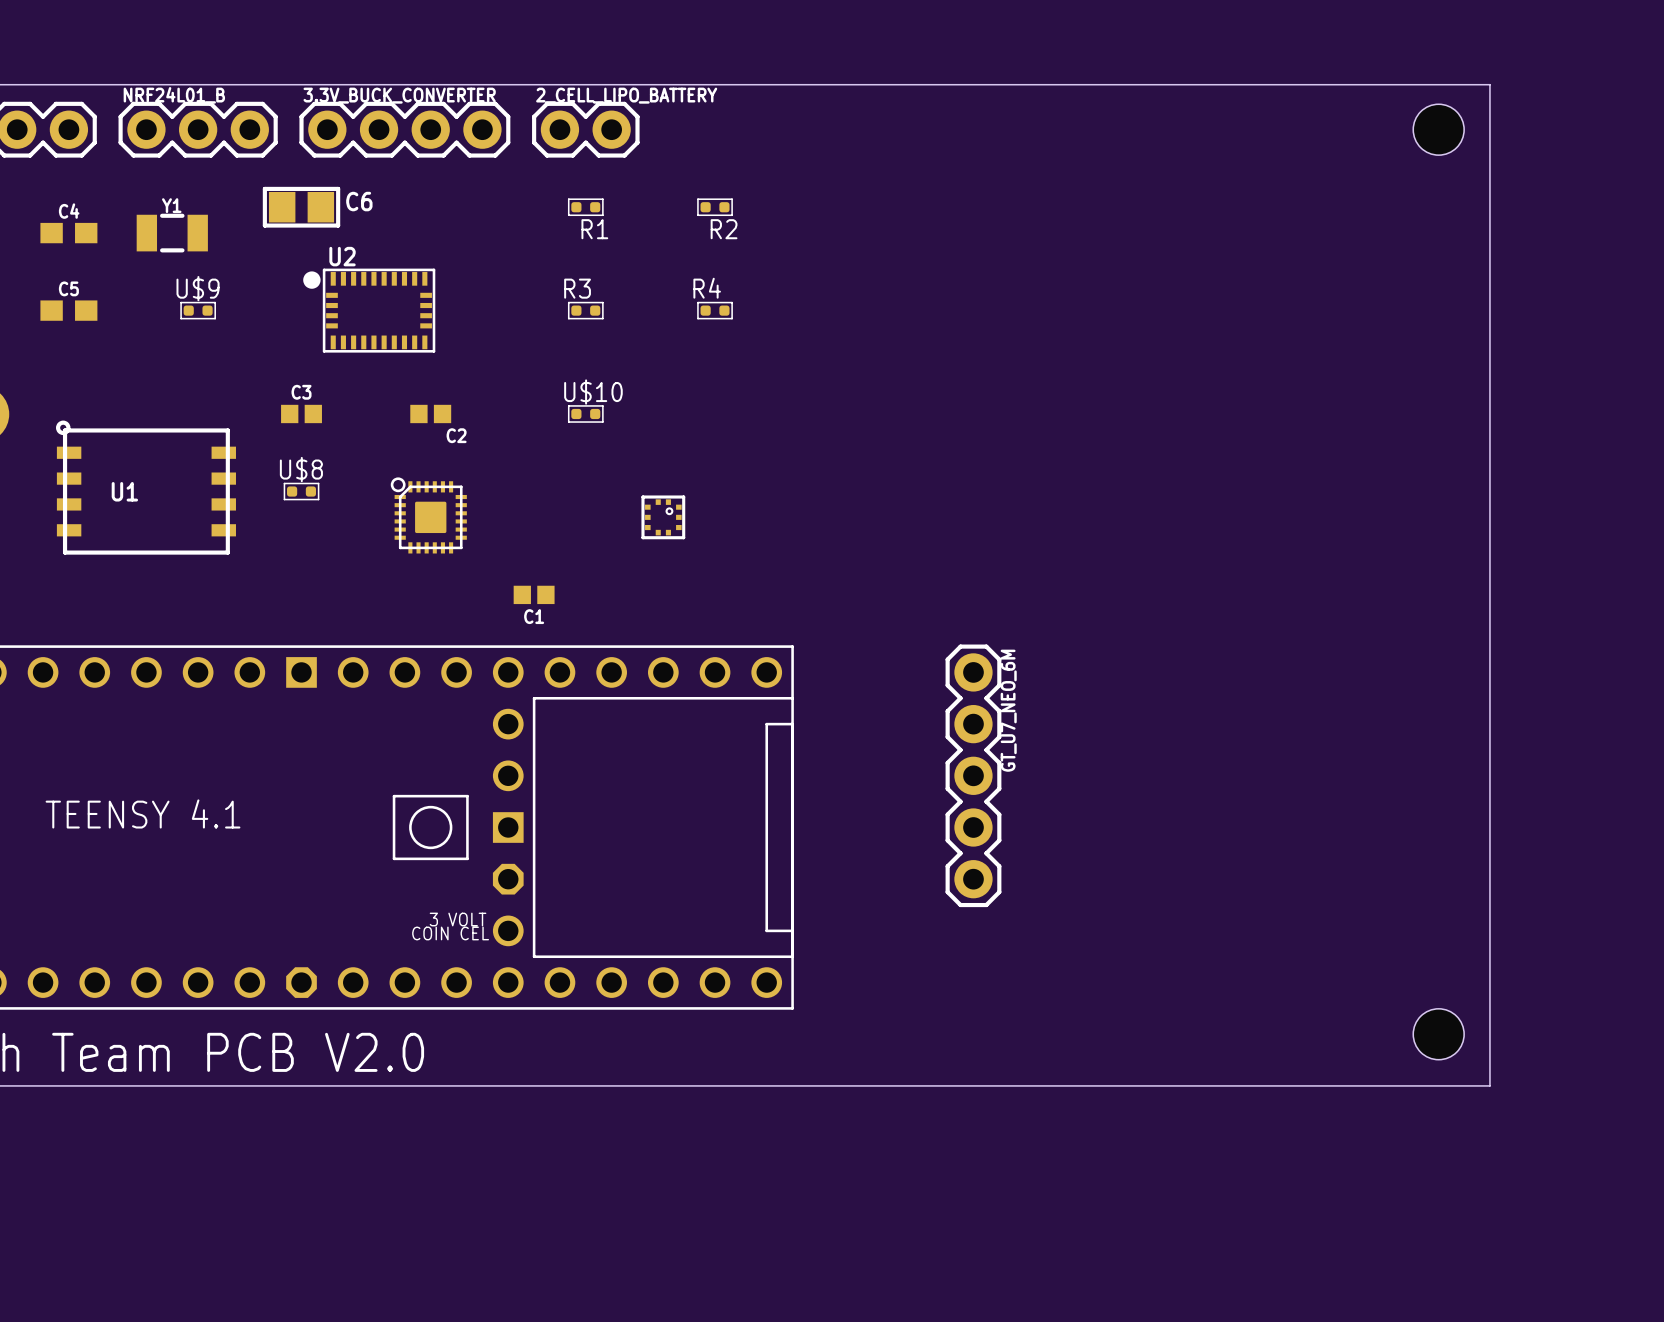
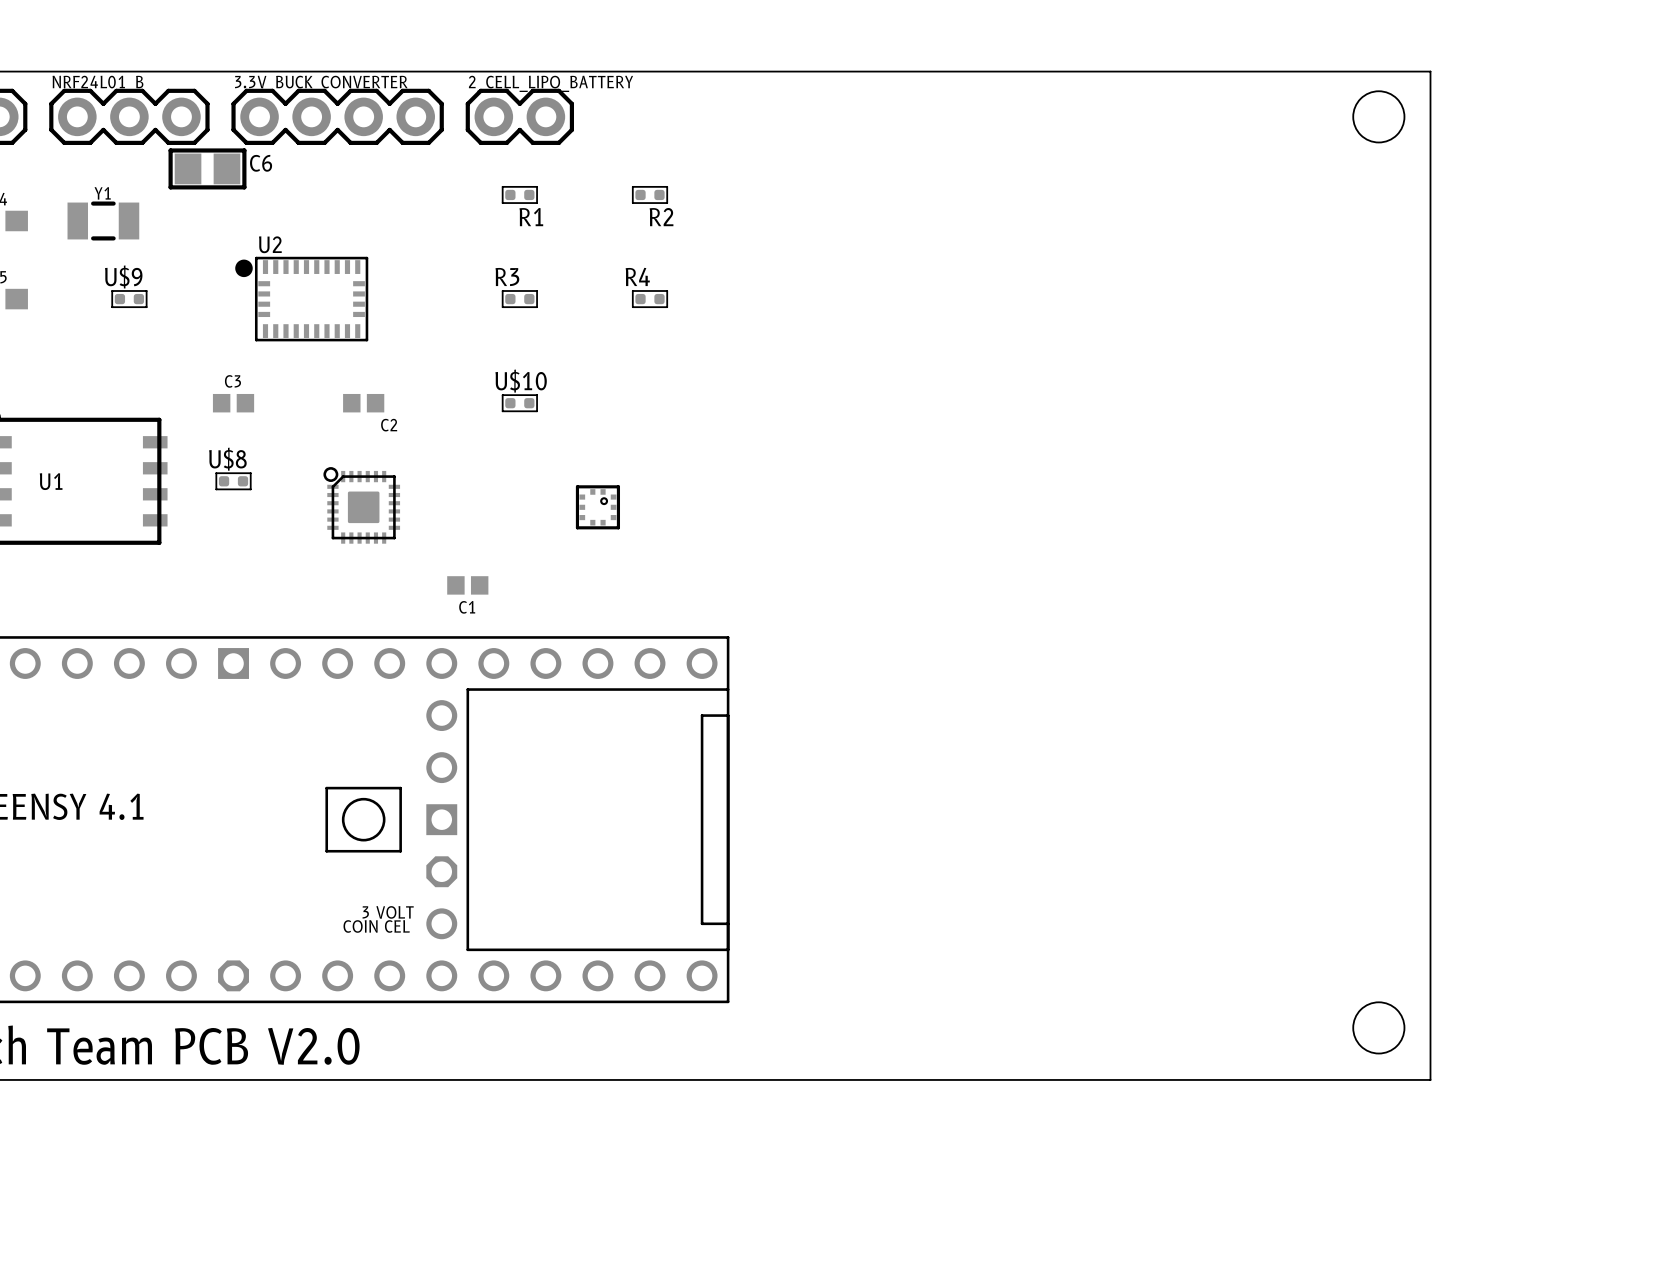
C6 position: (301, 207) -> (207, 168)
GT_U7_NEO_6M: (973, 775) -> none

